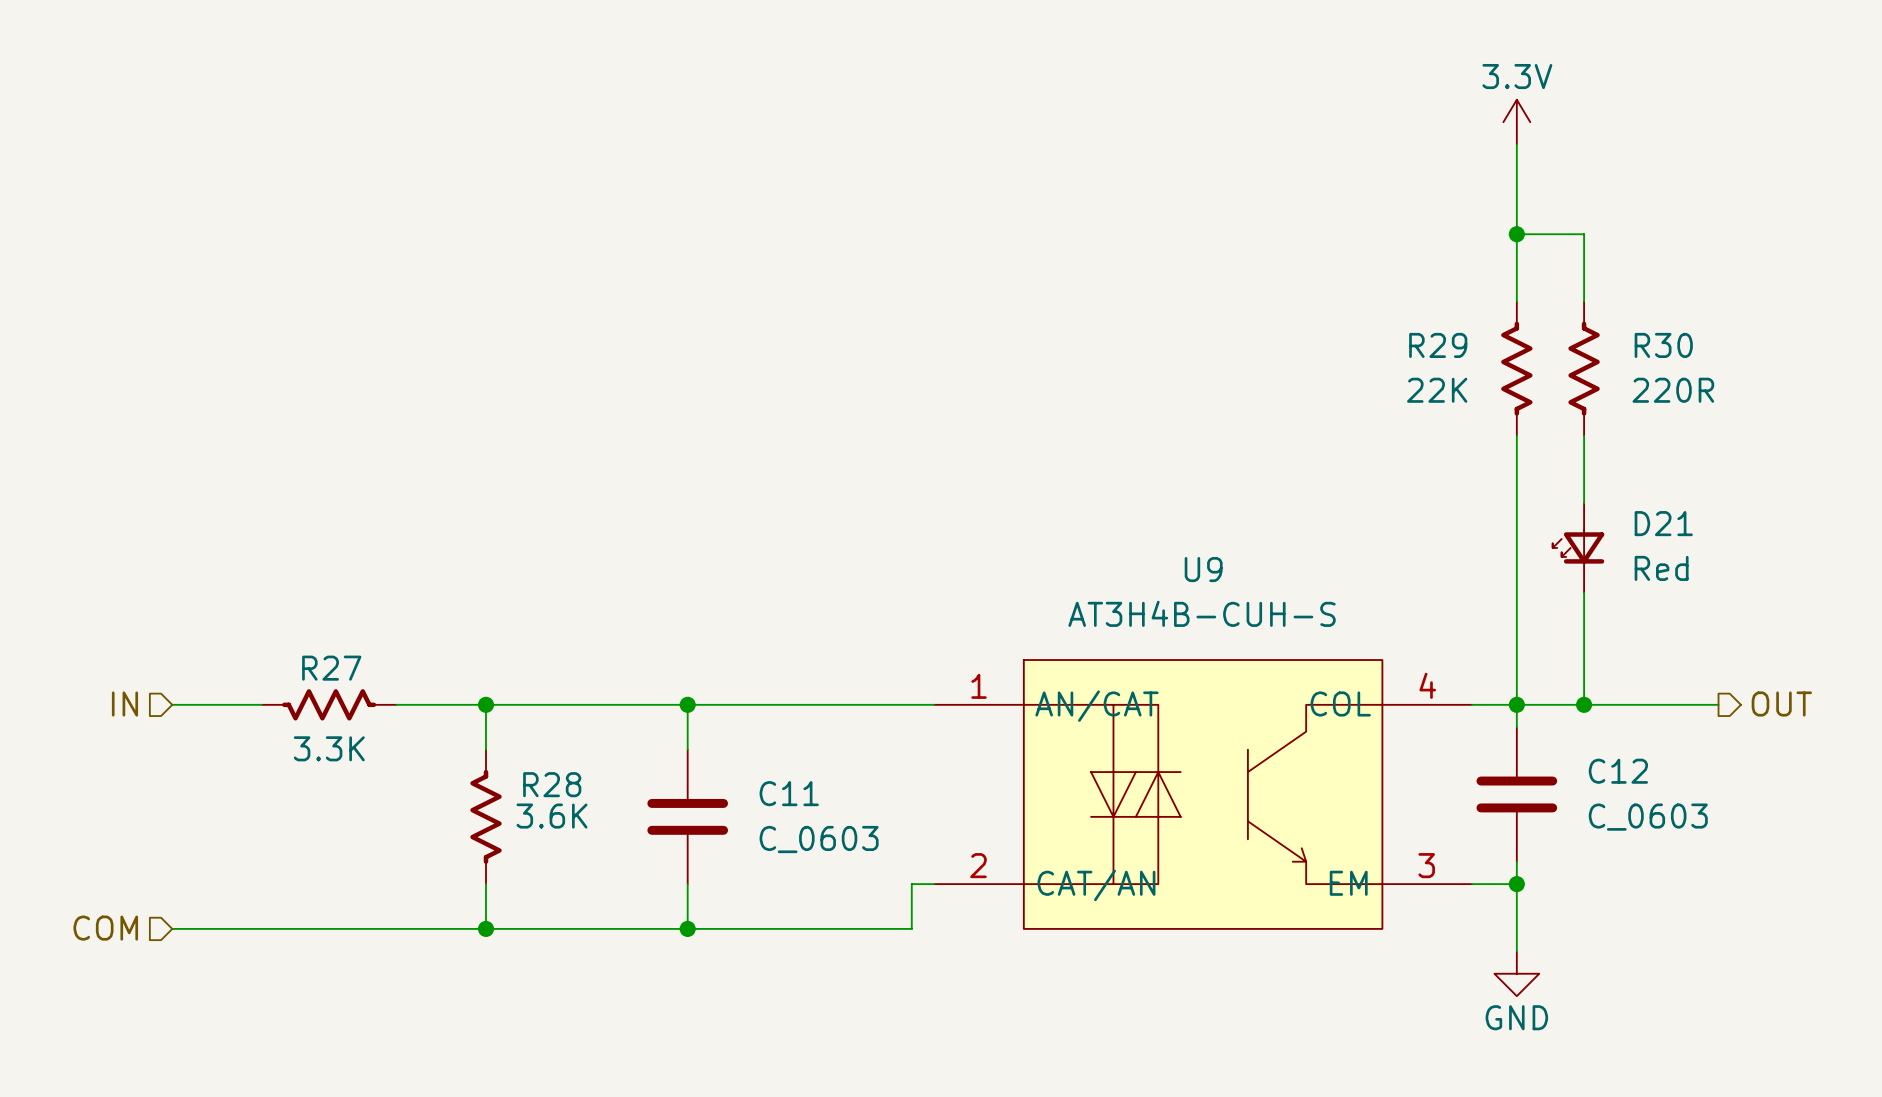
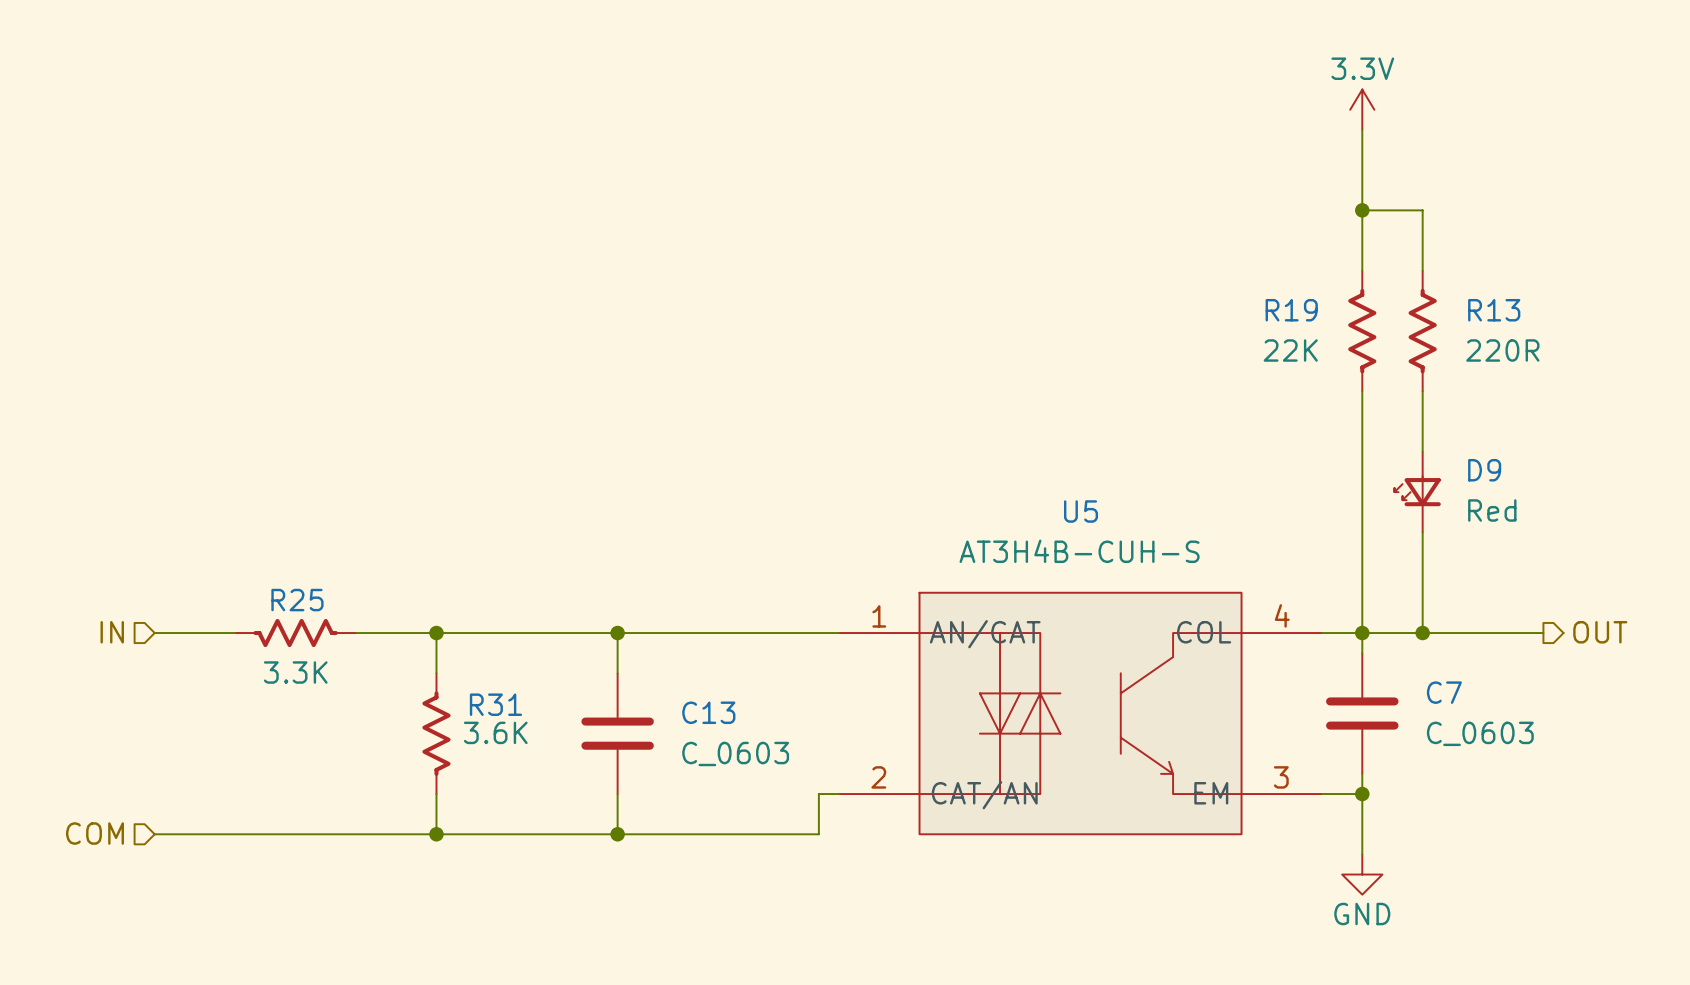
R29 name: R29 (1438, 345) -> R19 (1291, 310)
R30 name: R30 (1663, 345) -> R13 (1494, 310)
D21 name: D21 (1663, 523) -> D9 (1484, 470)
U9 name: U9 (1203, 569) -> U5 (1081, 511)
R27 name: R27 (331, 668) -> R25 (297, 600)
C12 name: C12 (1618, 771) -> C7 (1444, 692)
R28 name: R28 (552, 784) -> R31 (495, 704)
C11 name: C11 (789, 793) -> C13 (708, 712)

